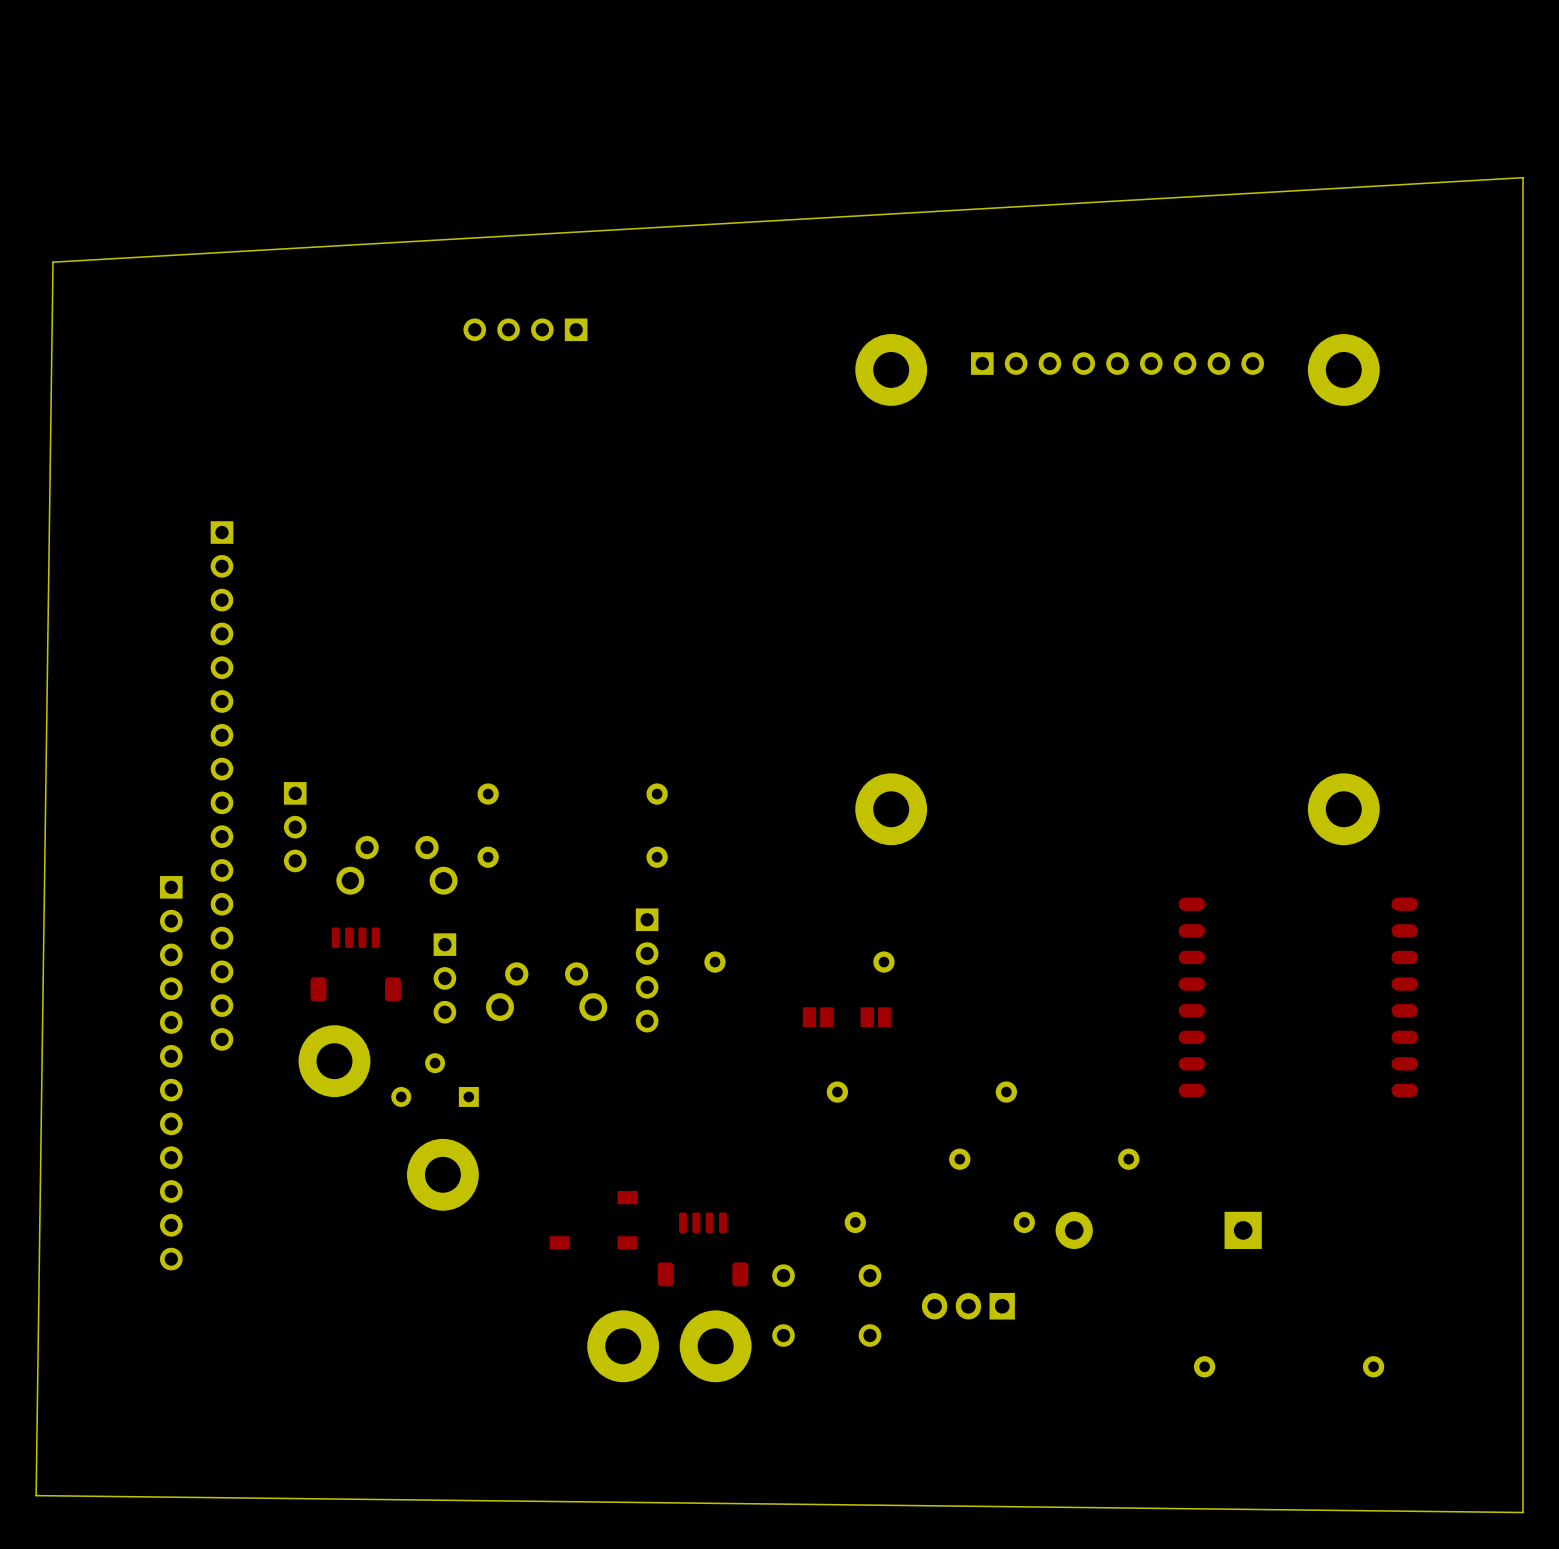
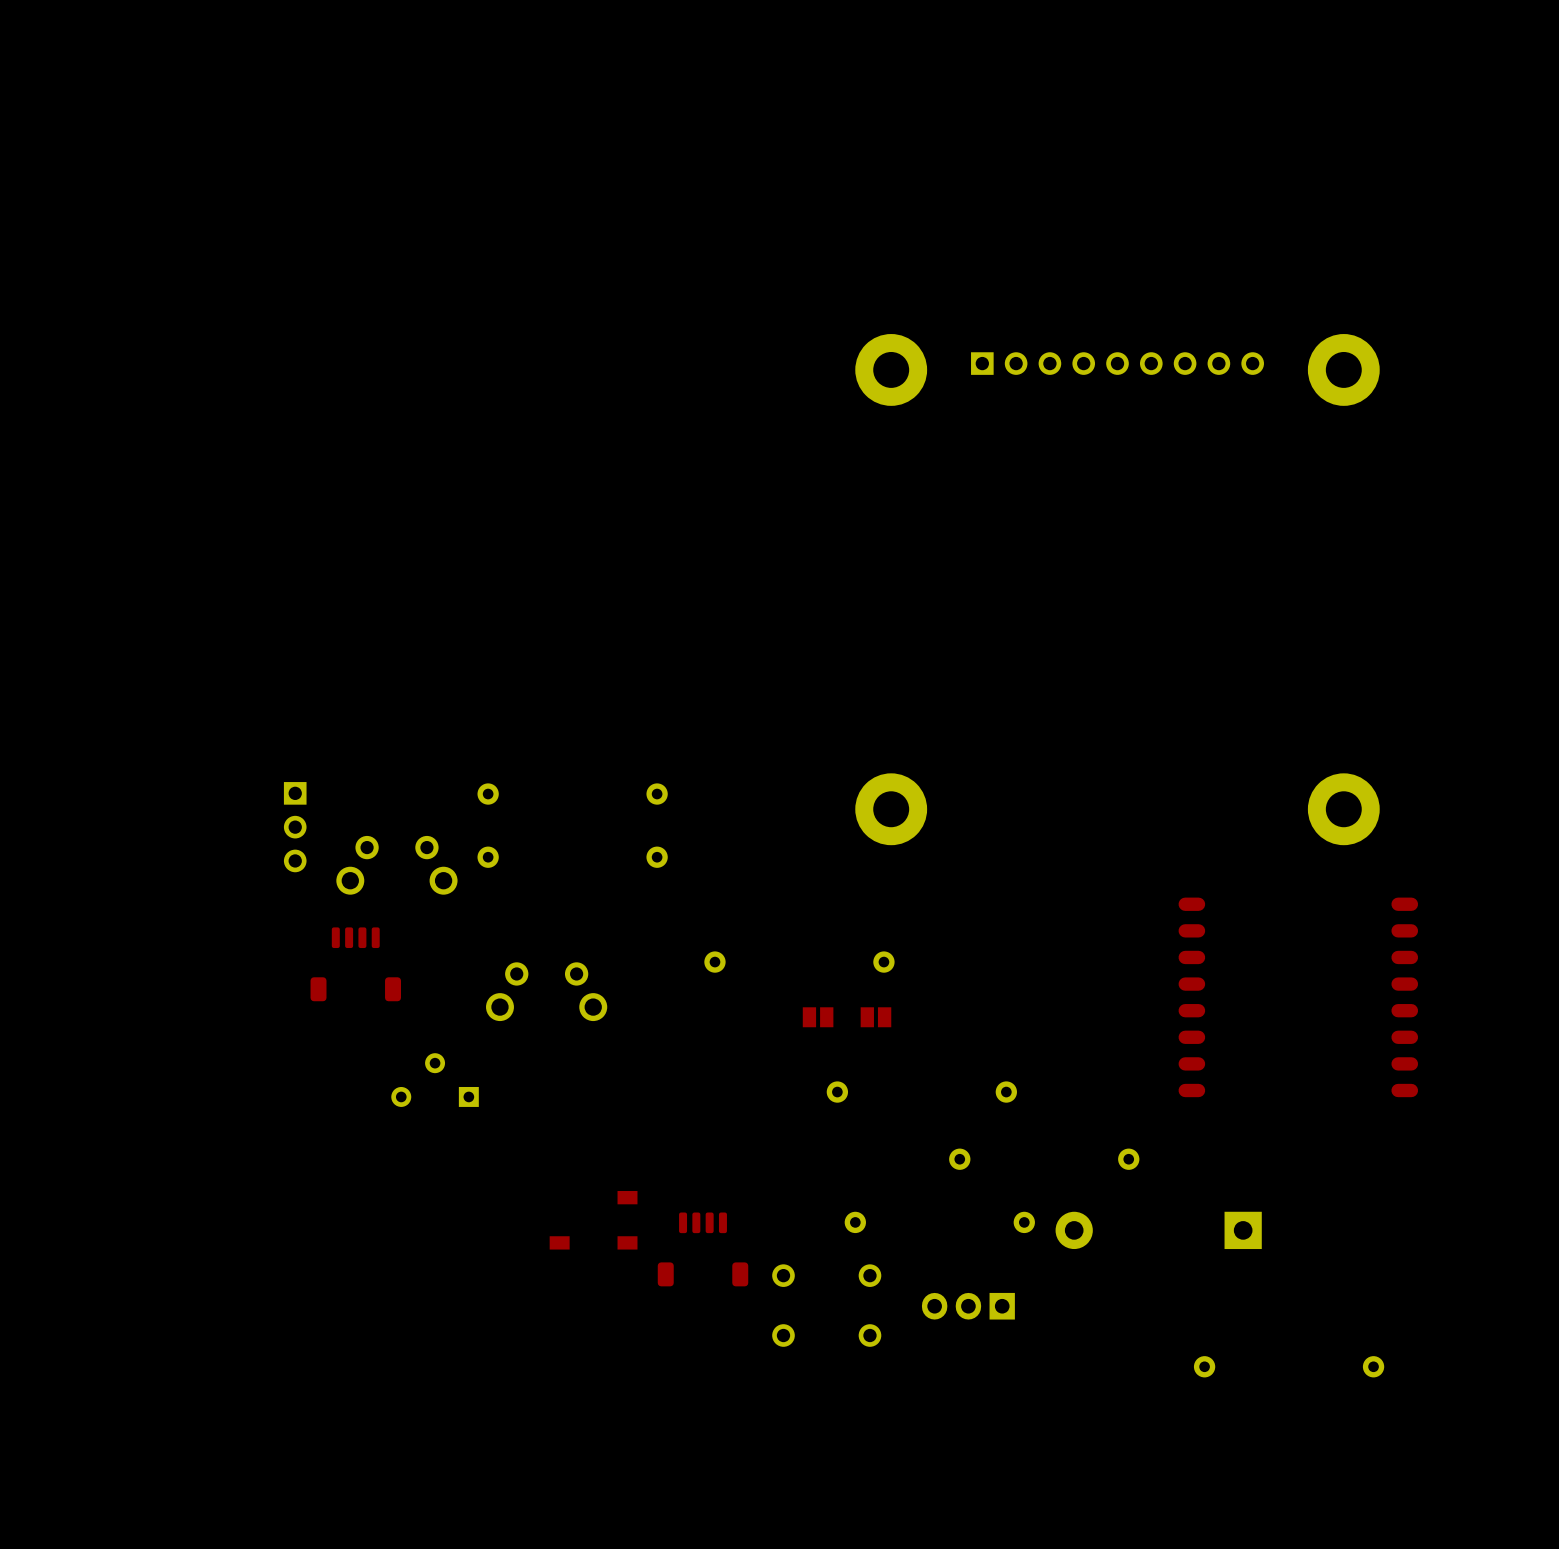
board edge: (1523, 177) (53, 262) (36, 1495) (1523, 1512) (1523, 177) -> none
part: (525, 329) -> none
part: (221, 785) -> none
part: (647, 970) -> none
part: (444, 978) -> none
part: (334, 1061) -> none
part: (171, 1073) -> none
part: (442, 1174) -> none
part: (623, 1346) -> none
part: (715, 1346) -> none

